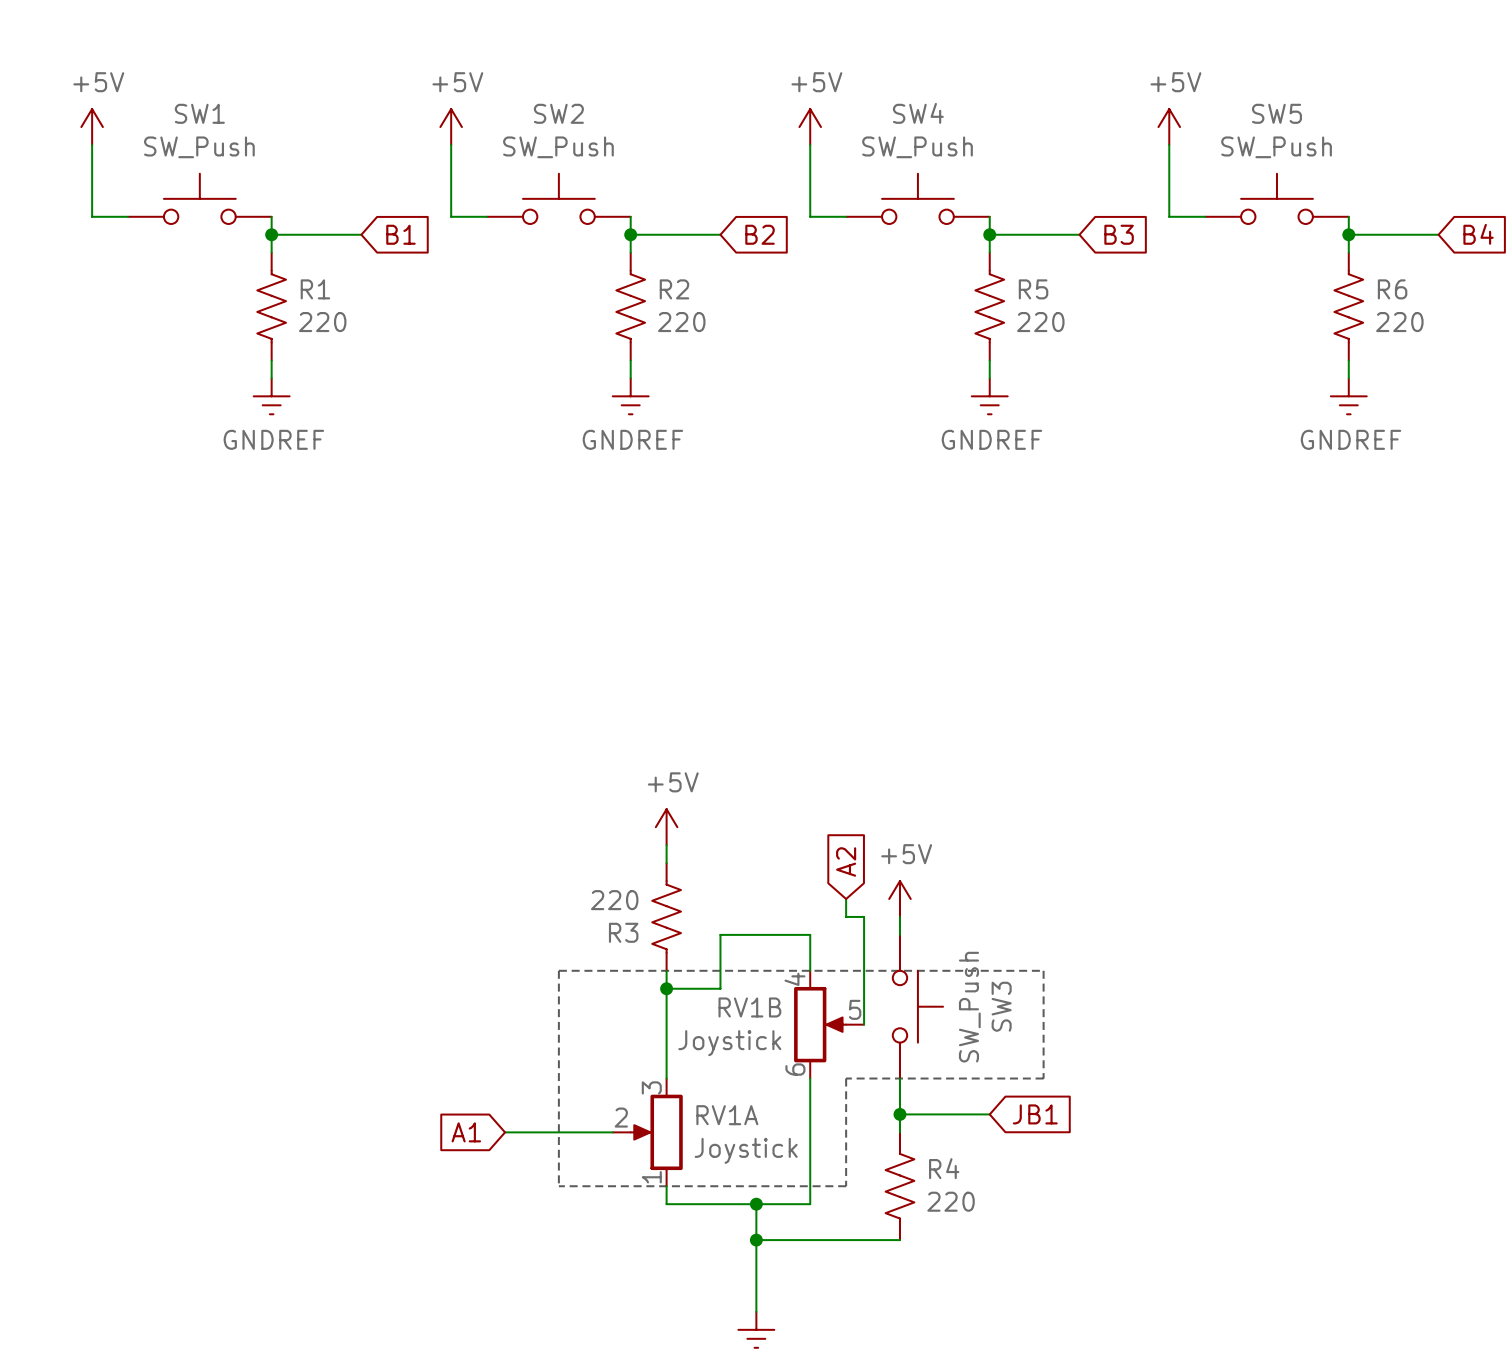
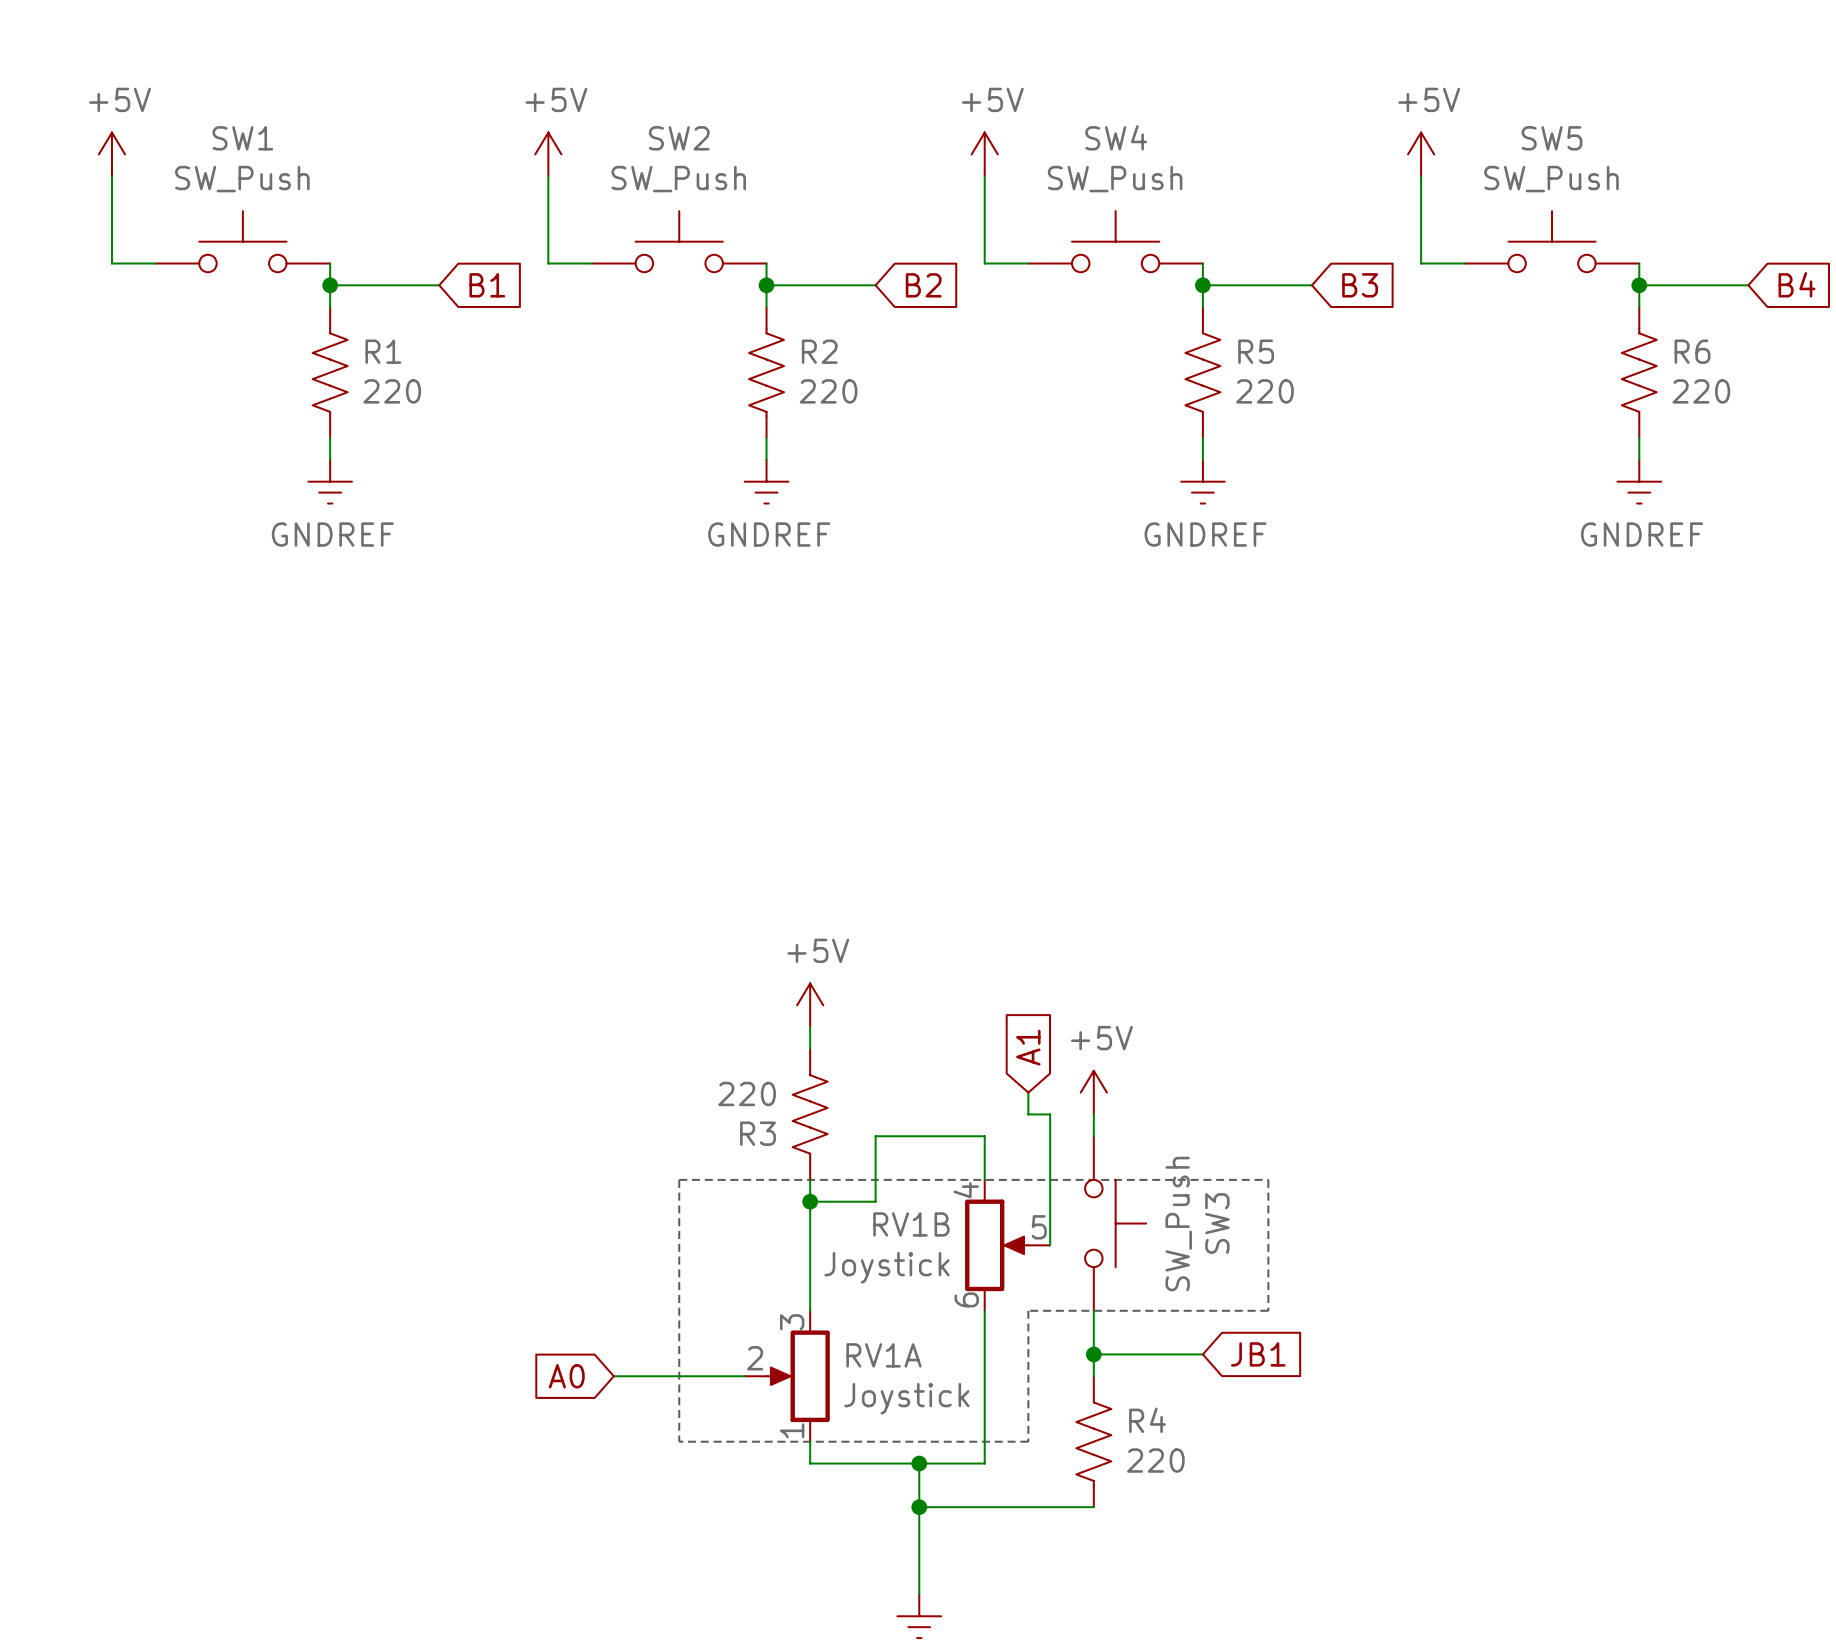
global label: A2 (846, 861) -> A1 (1028, 1047)
global label: A1 (466, 1132) -> A0 (566, 1376)

